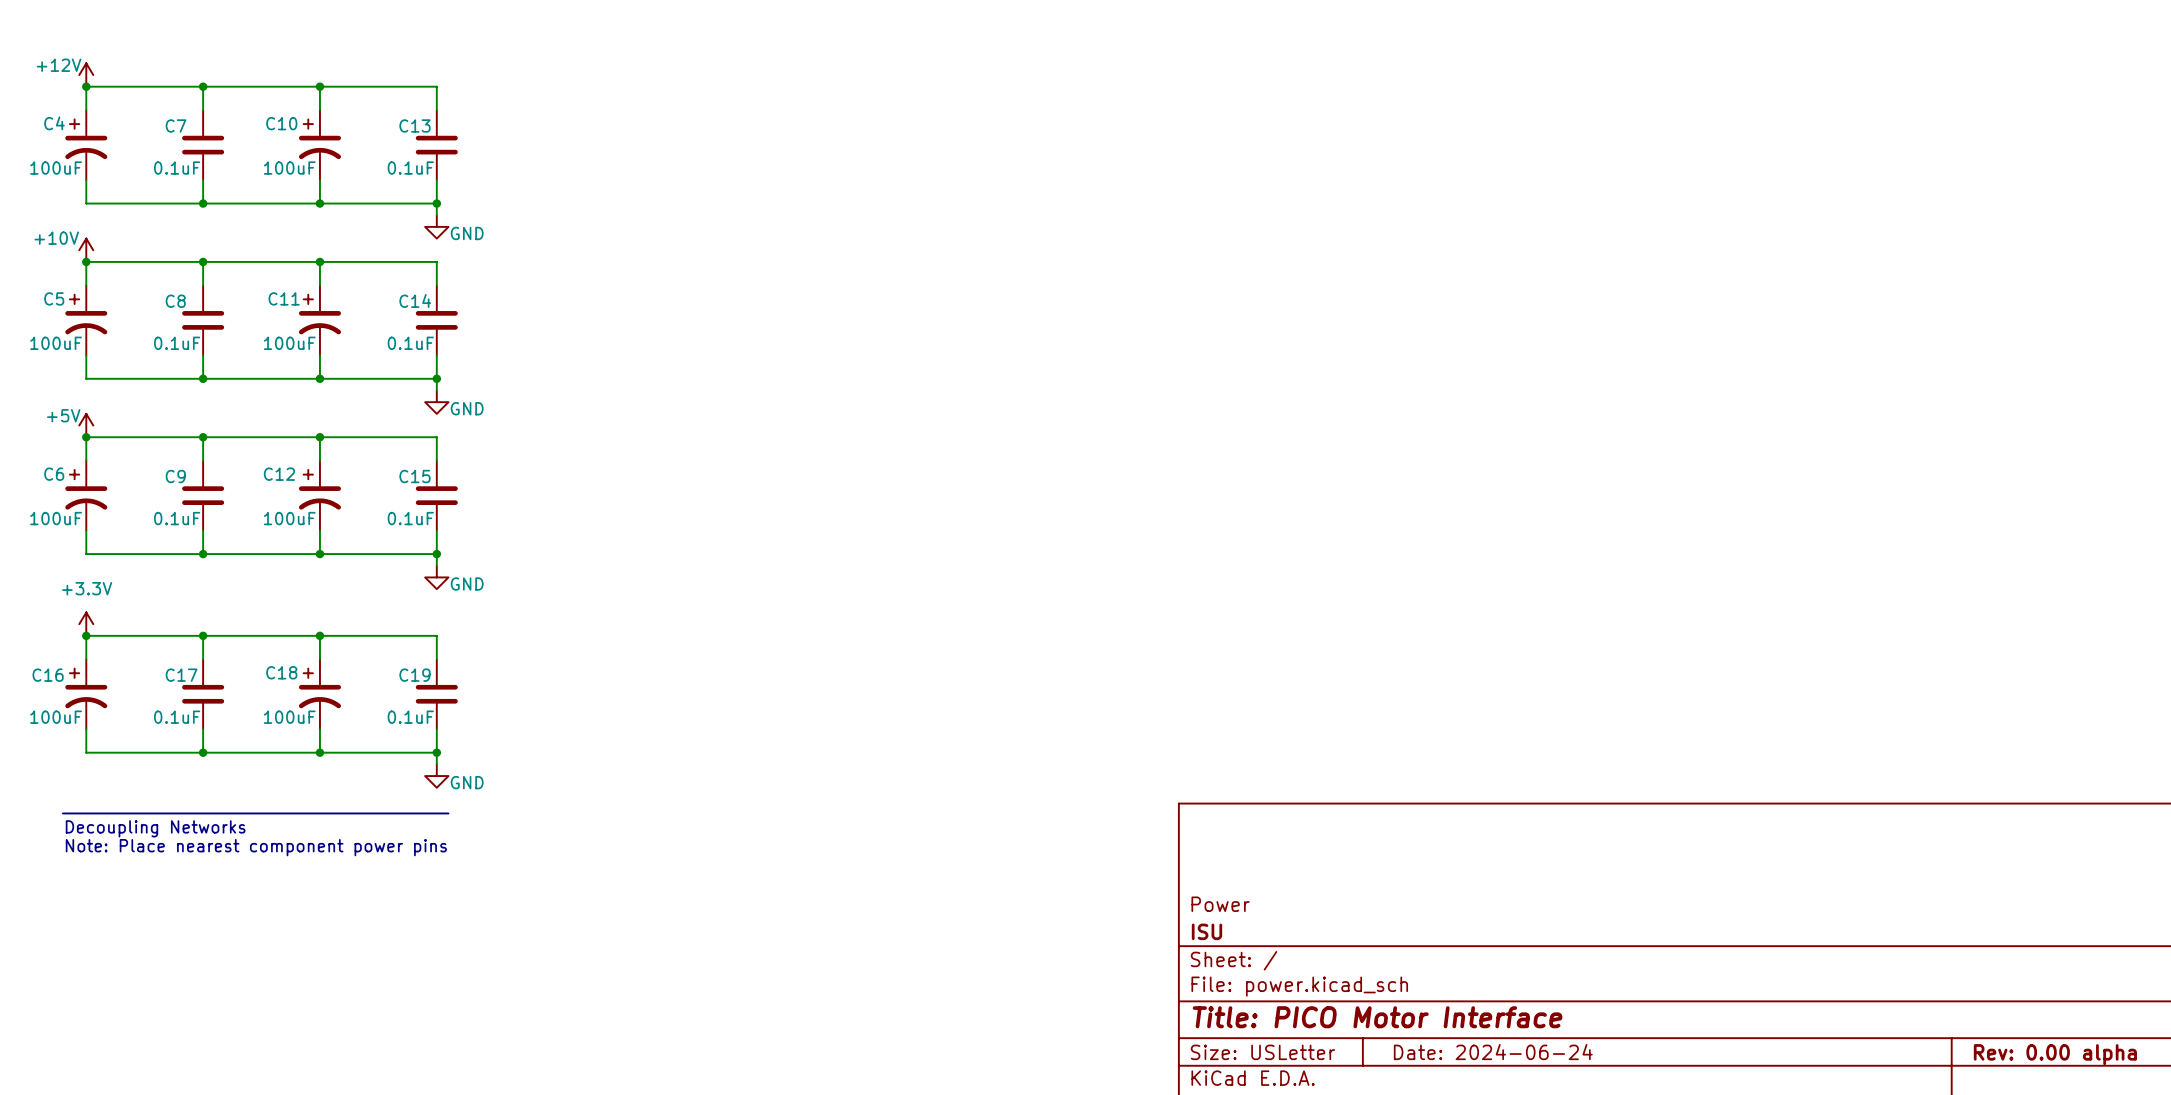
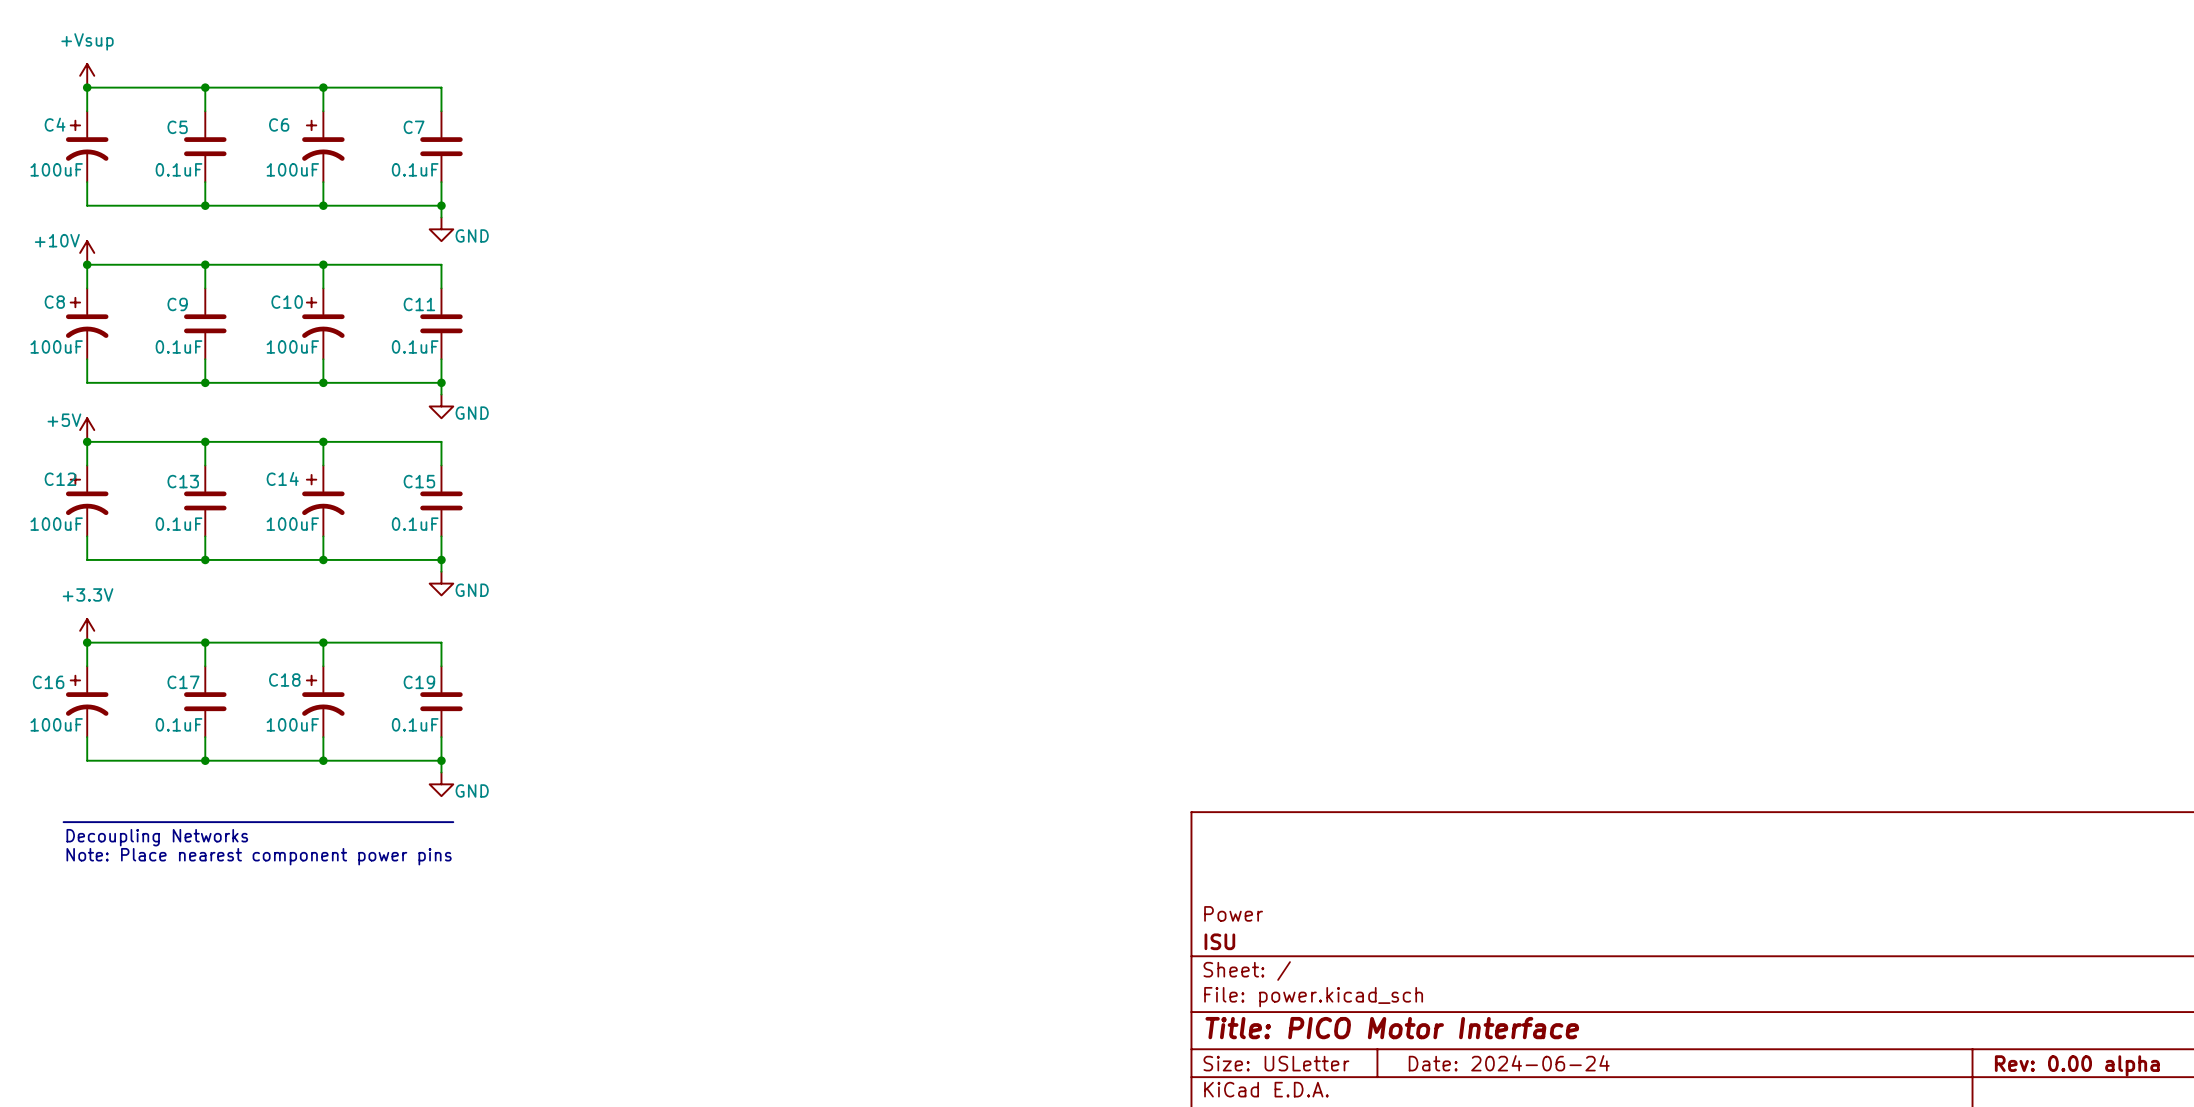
power symbol: +12V (86, 75) -> +Vsup (87, 75)
C10 name: C10 (281, 123) -> C6 (279, 124)
C7 name: C7 (176, 125) -> C5 (177, 127)
C13 name: C13 (414, 125) -> C7 (414, 127)
C5 name: C5 (54, 298) -> C8 (54, 302)
C11 name: C11 (284, 298) -> C10 (287, 302)
C14 name: C14 (415, 300) -> C11 (419, 304)
C8 name: C8 (175, 301) -> C9 (177, 304)
C6 name: C6 (54, 474) -> C12 (60, 479)
C12 name: C12 (279, 474) -> C14 (282, 478)
C9 name: C9 (175, 476) -> C13 (183, 481)

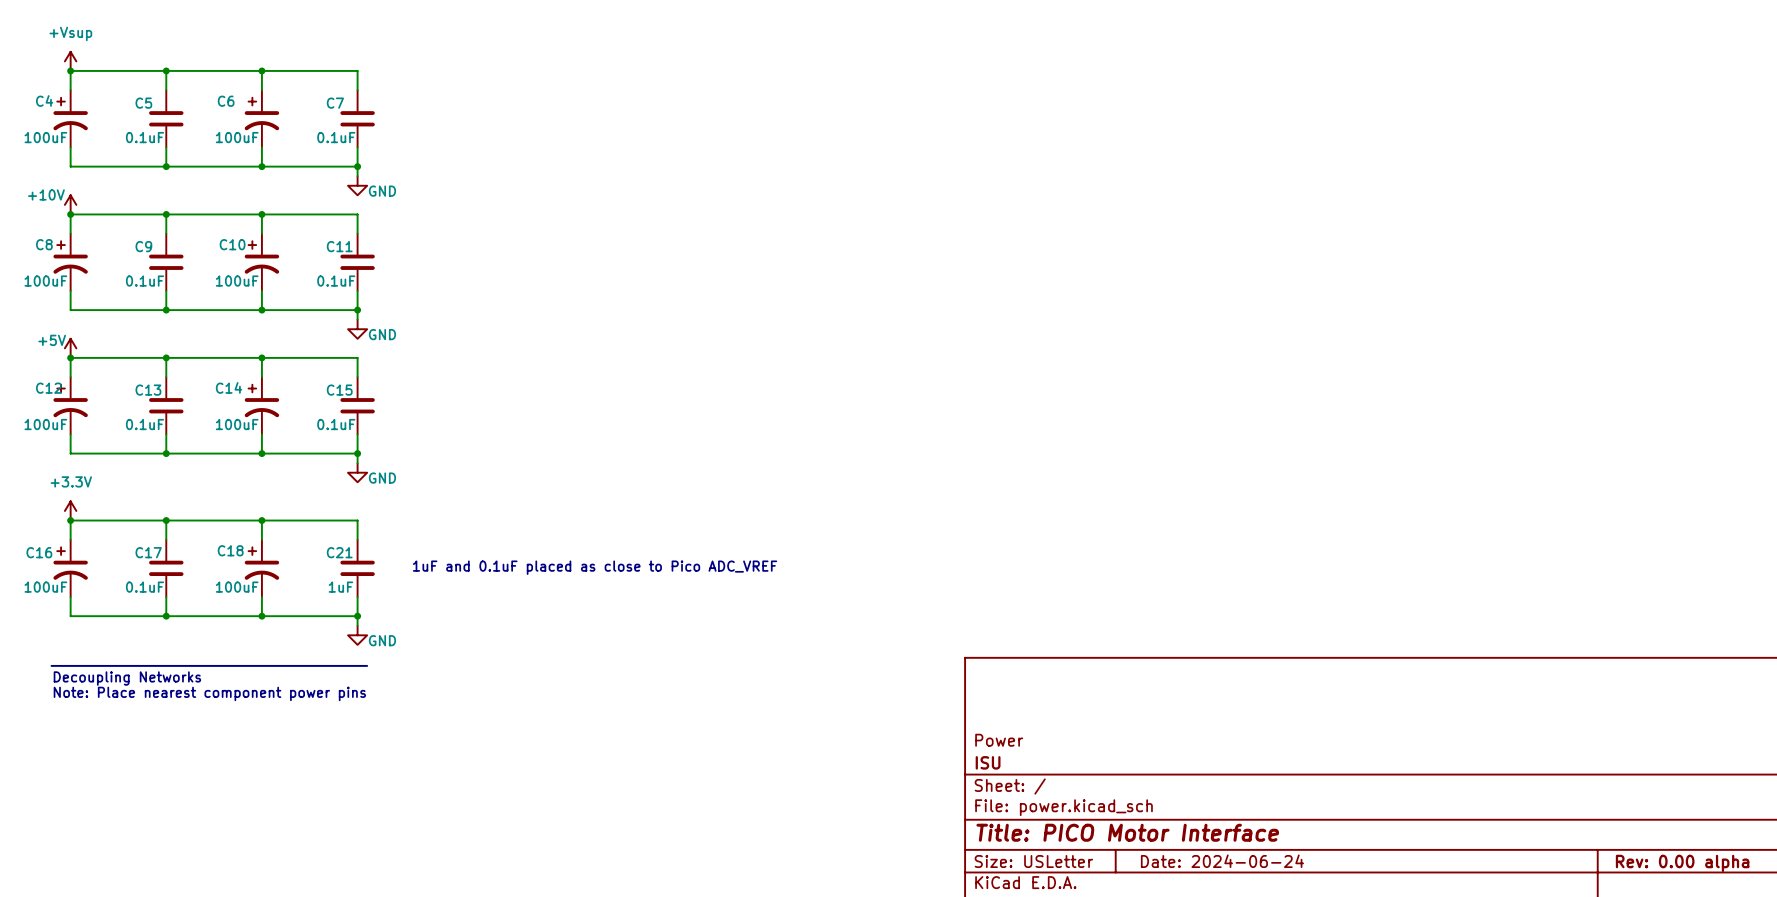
C19 name: C19 (419, 682) -> C21 (339, 552)
text: none -> 1uF and 0.1uF placed as close to Pico ADC_VREF (595, 567)
C19 value: 0.1uF (415, 724) -> 1uF (340, 587)

